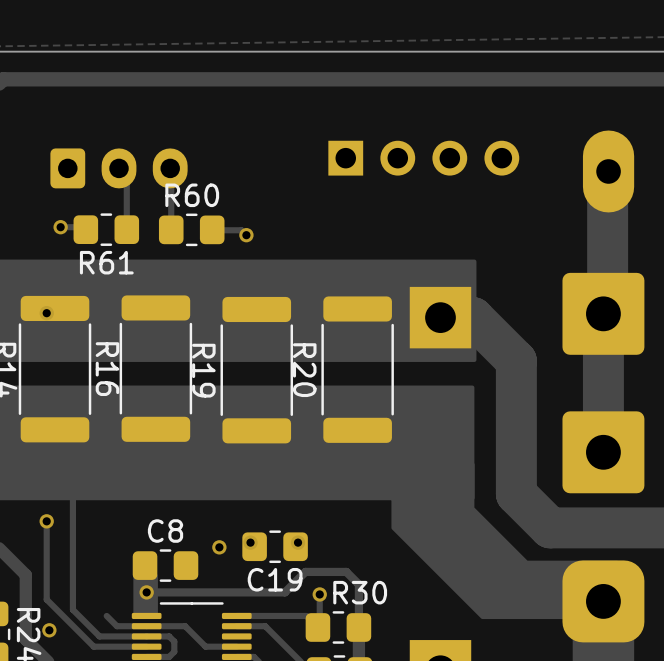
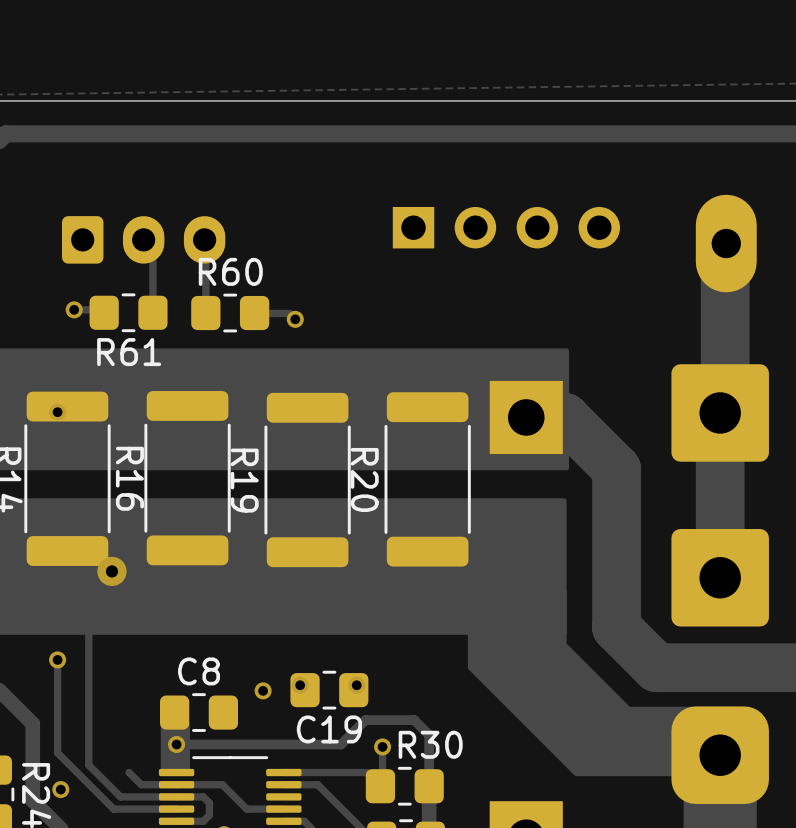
via: none -> (111, 571)

